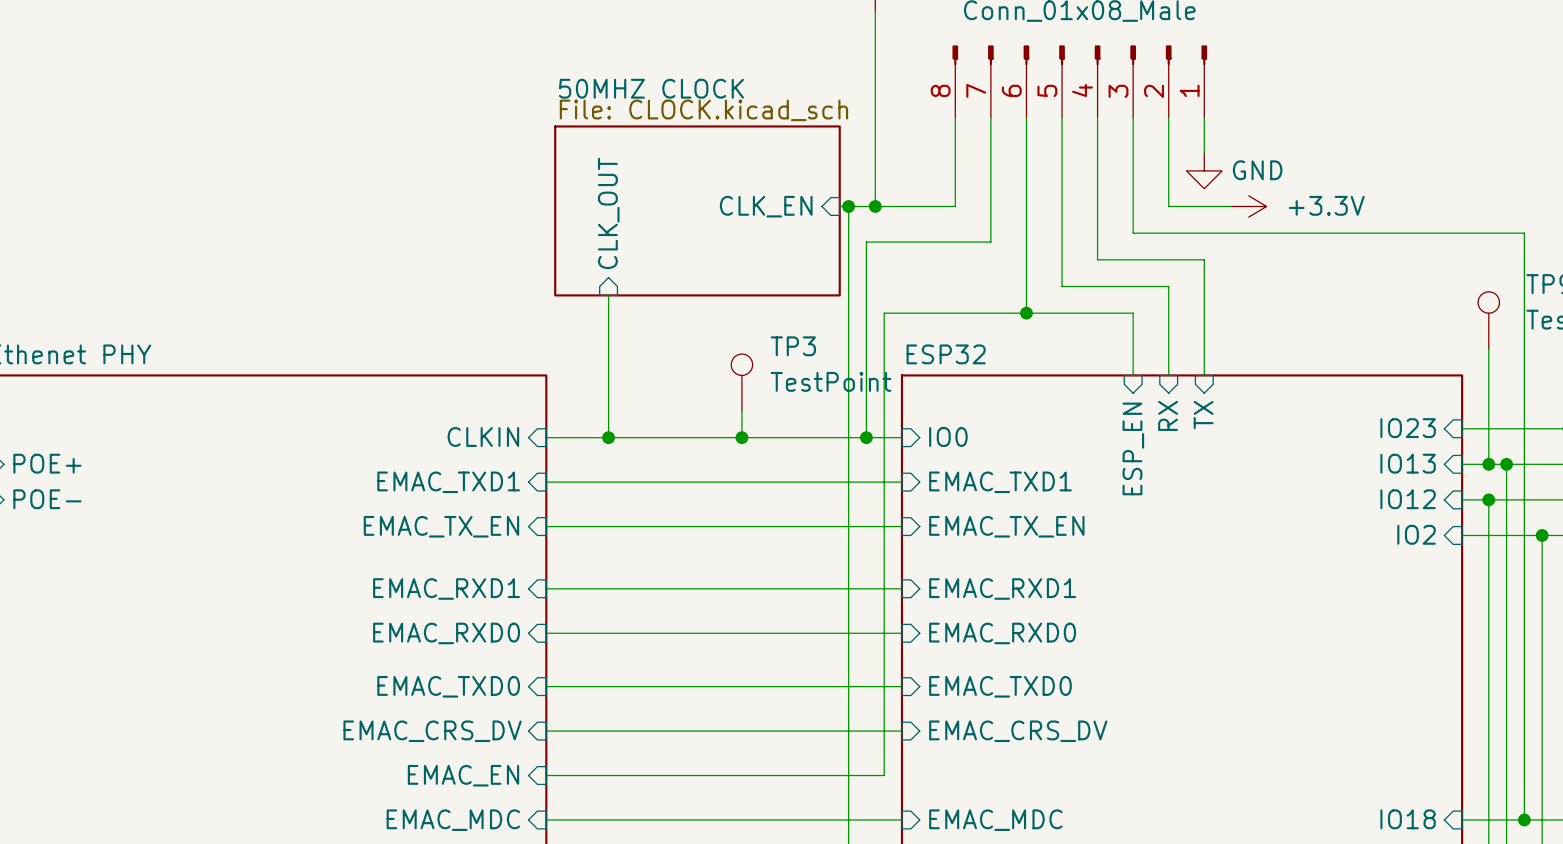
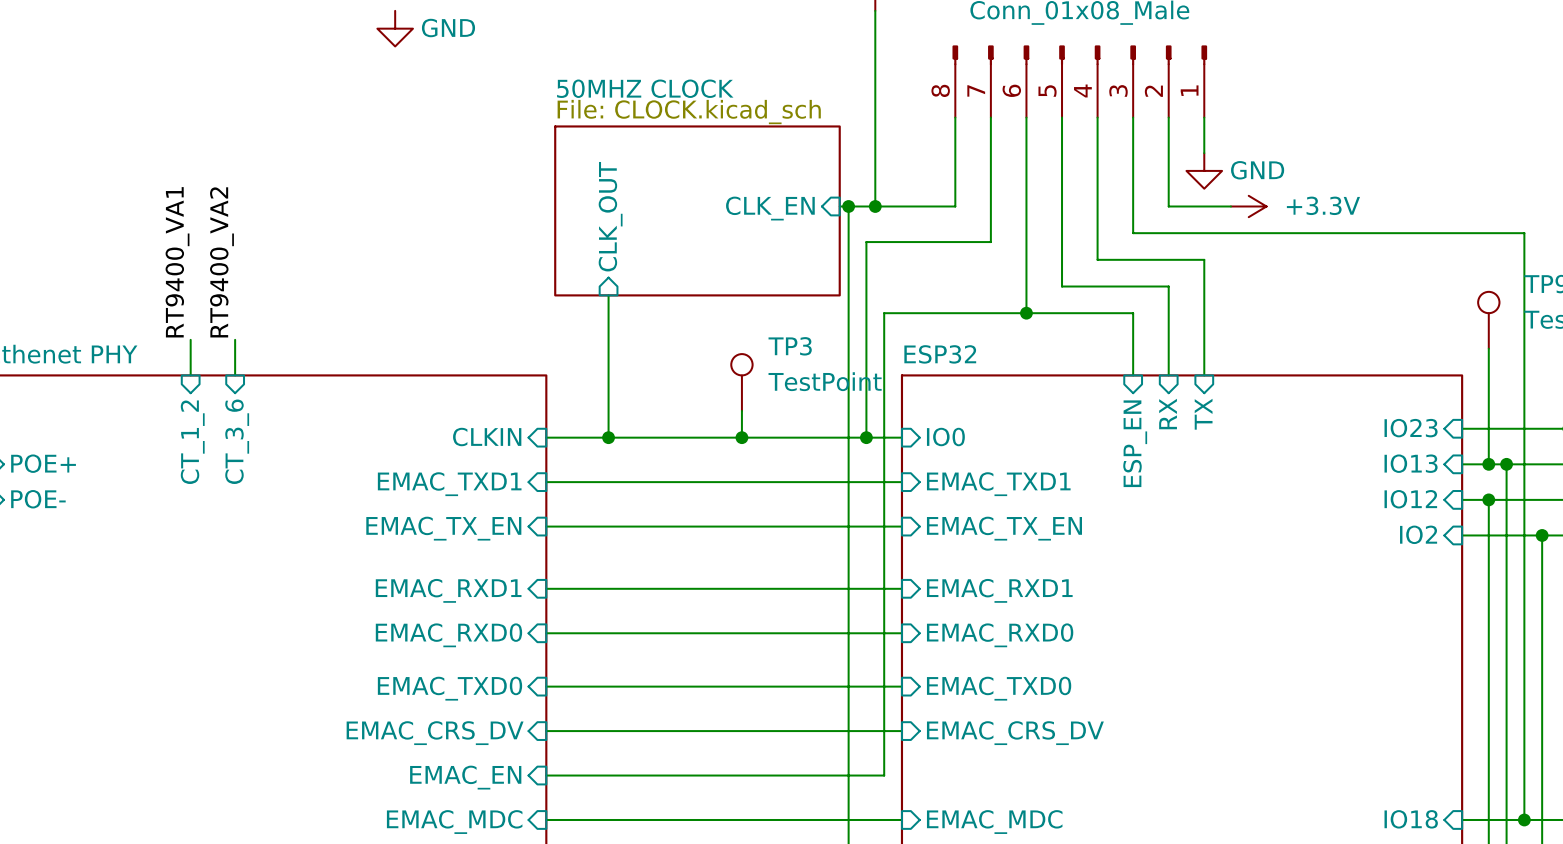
power symbol: none -> GND (395, 28)
label: none -> RT9400_VA1 (177, 262)
label: none -> RT9400_VA2 (221, 262)
wire: none -> (190, 339) (190, 375)
wire: none -> (235, 339) (235, 375)
sheet pin: none -> CT_1_2 (192, 442)
sheet pin: none -> CT_3_6 (237, 441)

